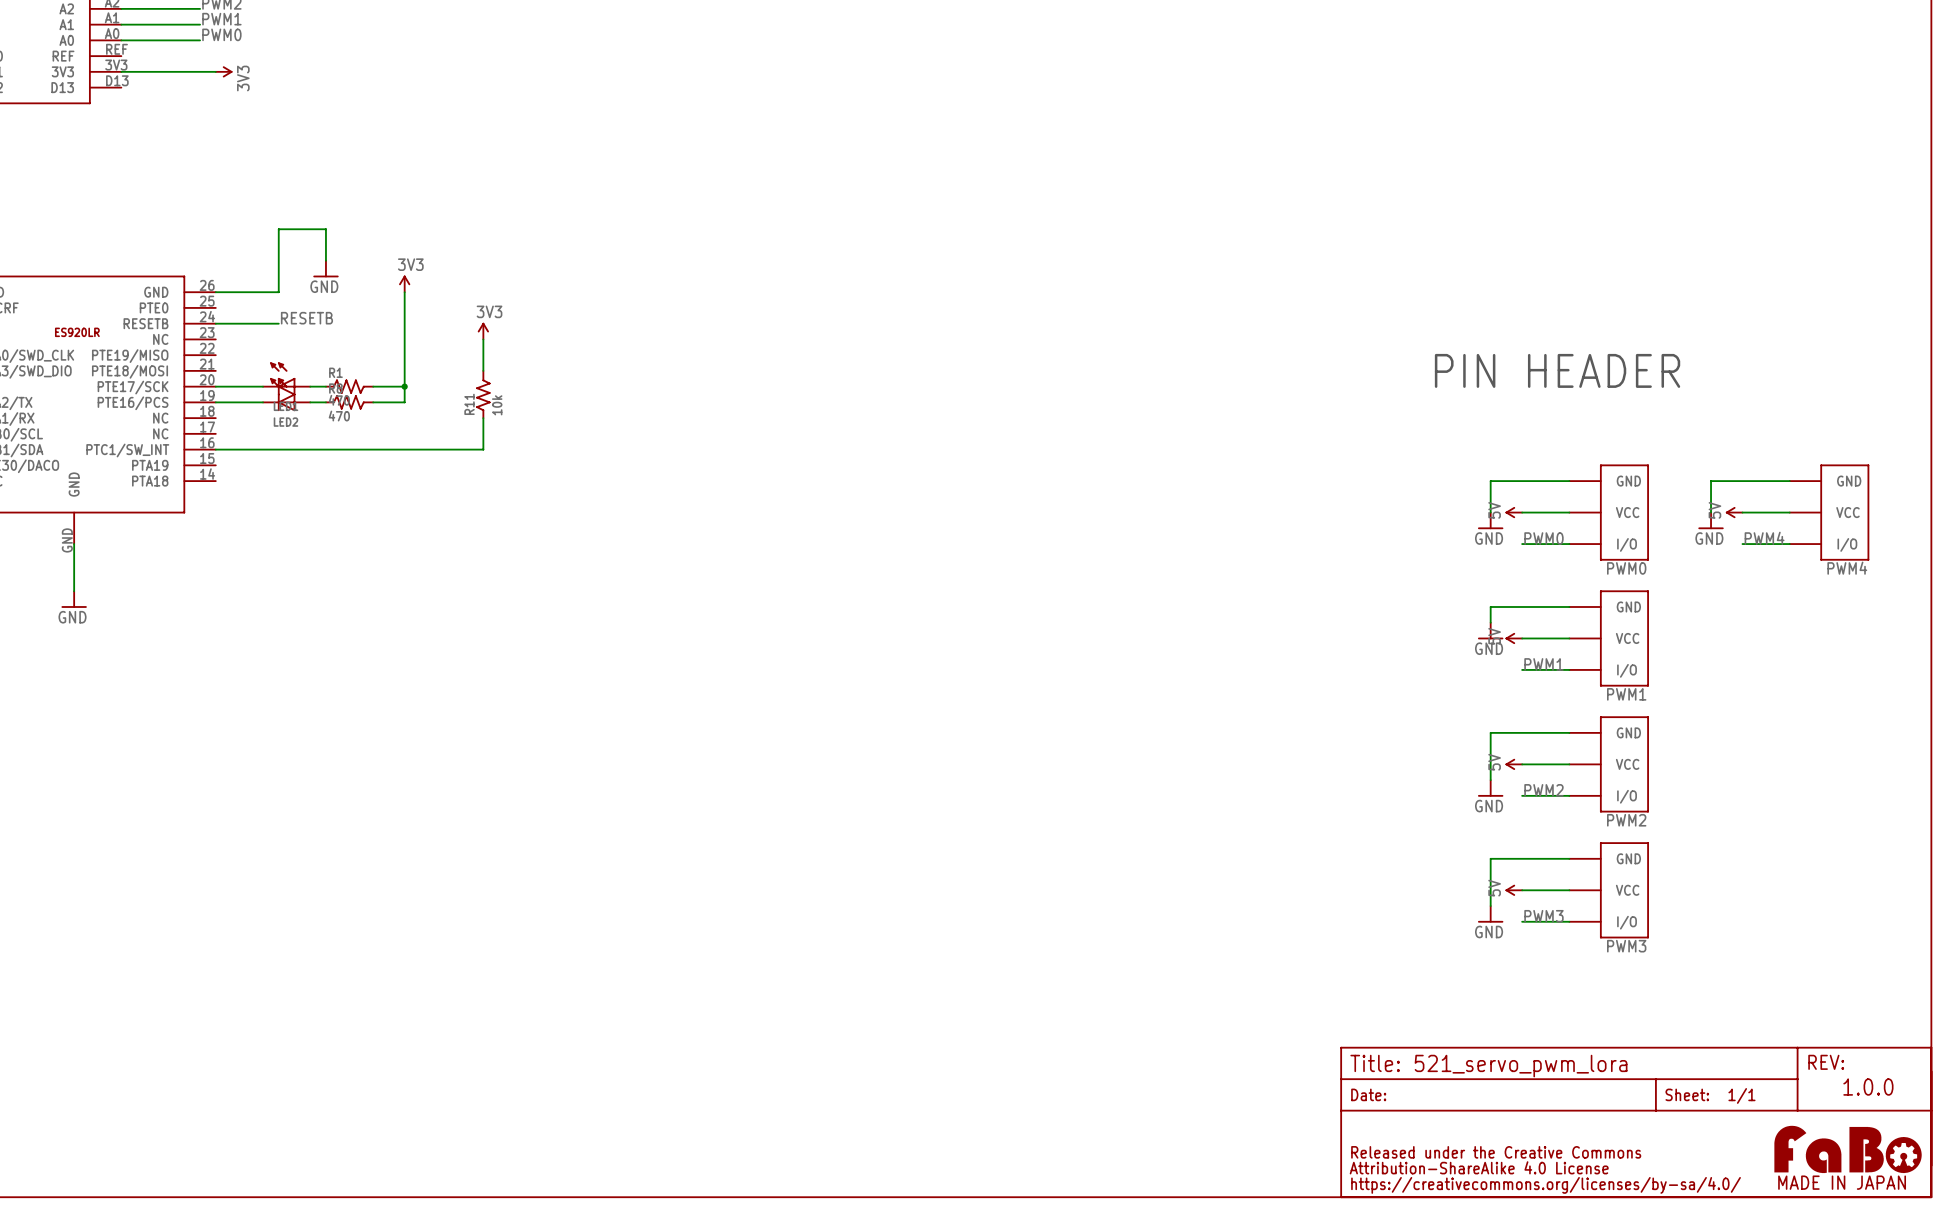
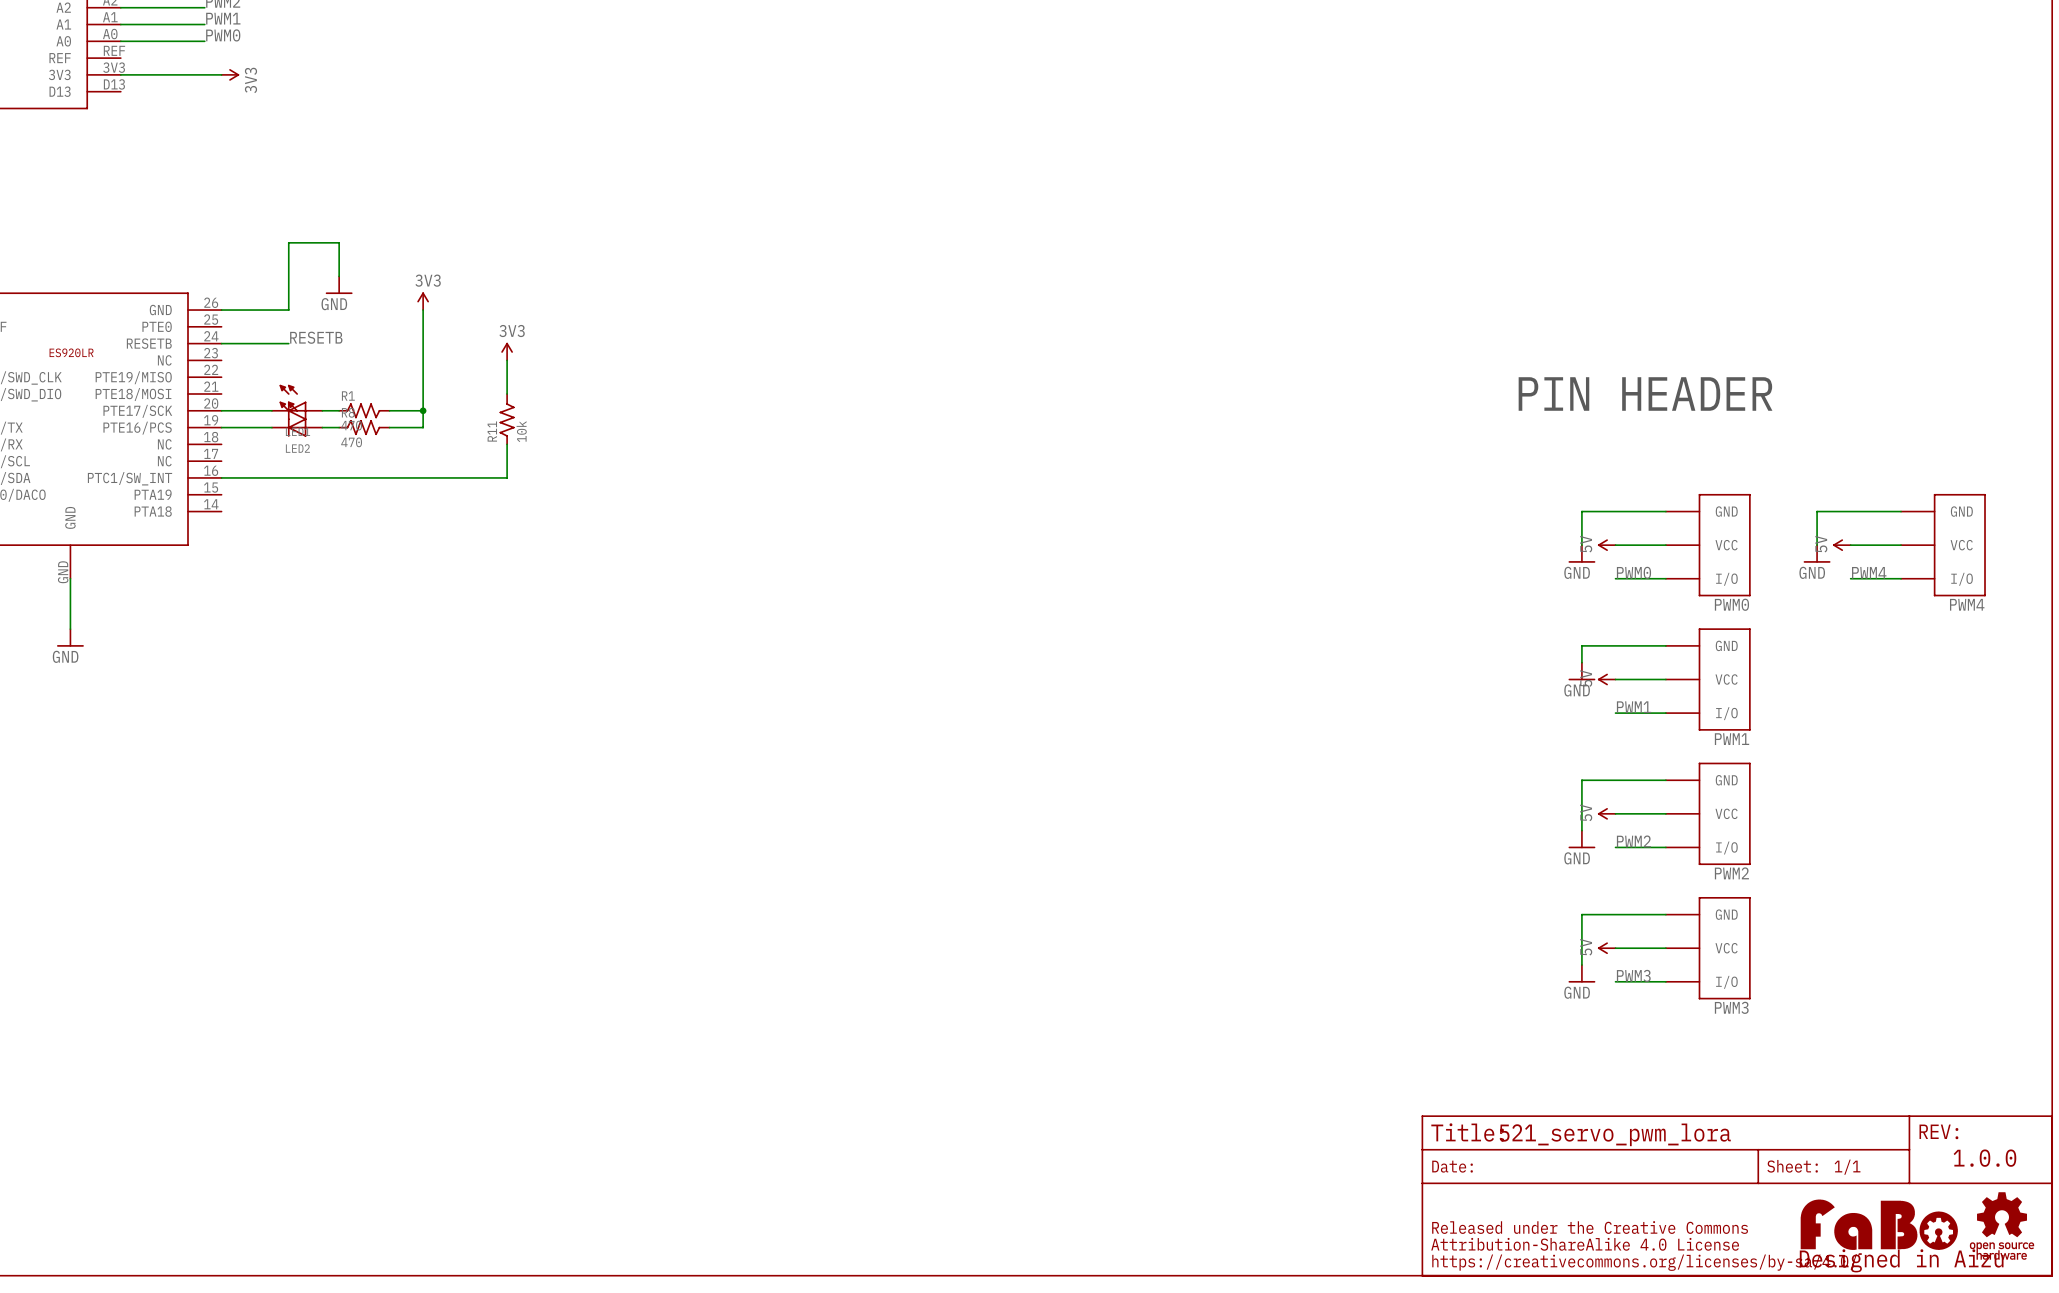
part: none -> (1879, 1224)
part: (1848, 1149) -> none
part: none -> (2002, 1225)

